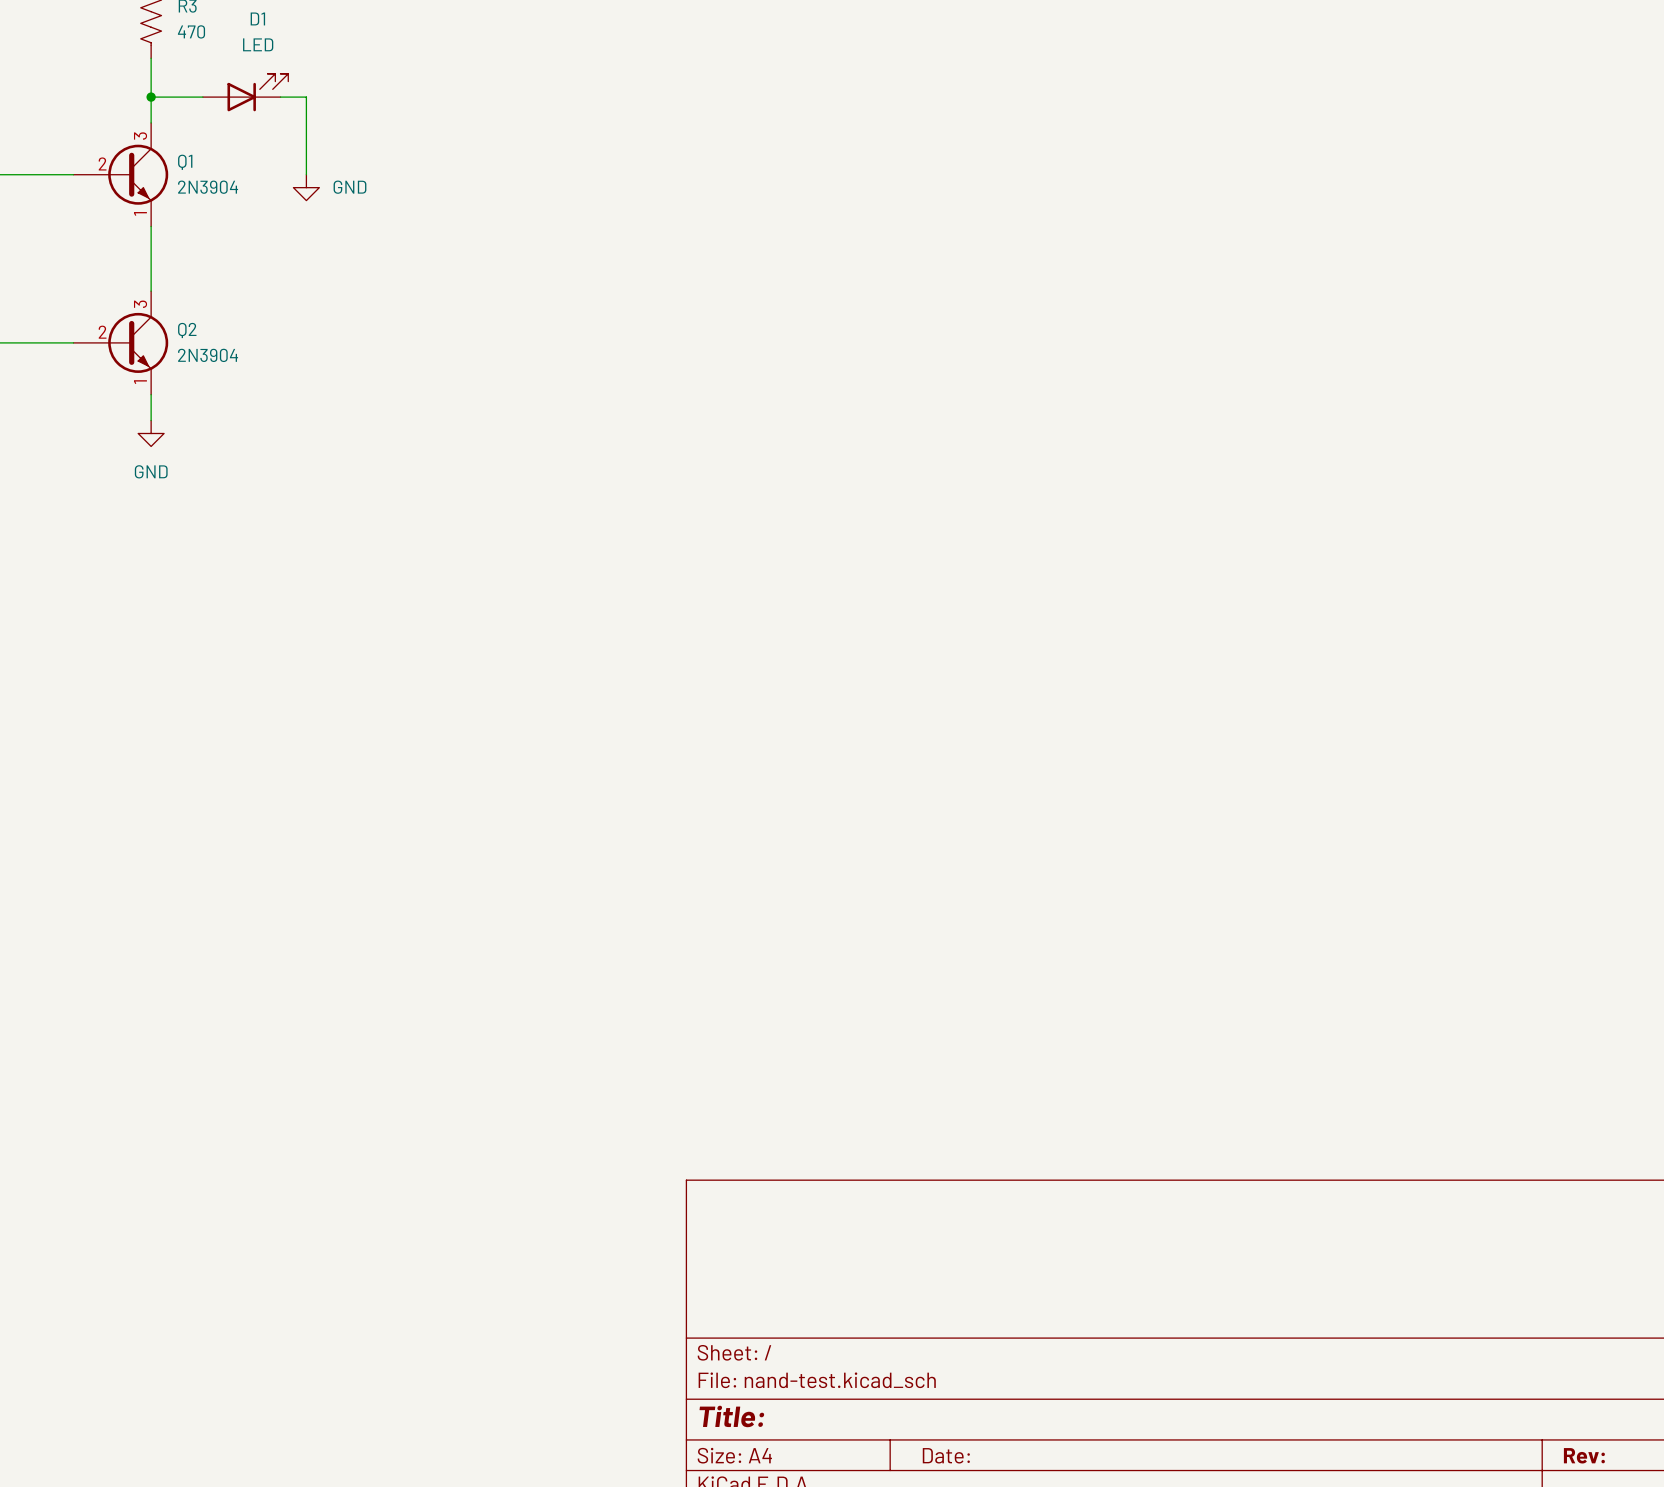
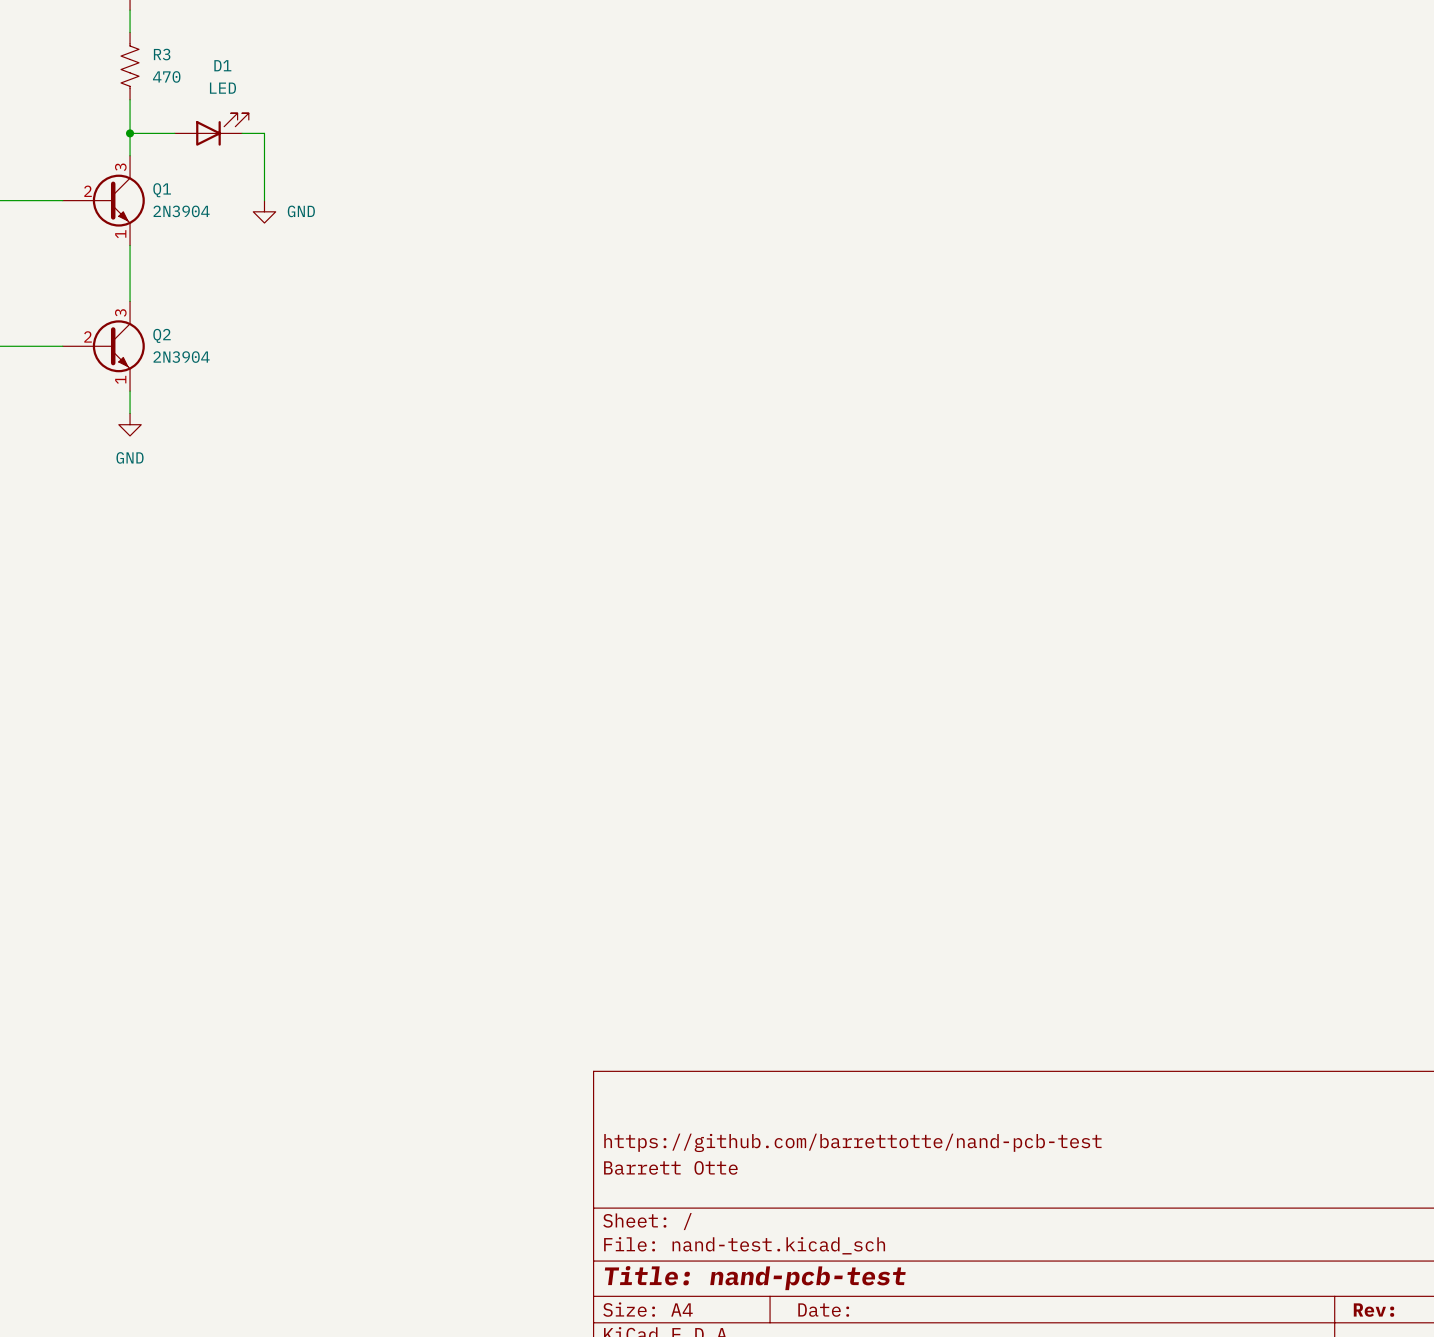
title block: none -> https://github.com/barrettotte/nand-pcb-test (852, 1142)
title block: none -> Barrett Otte (670, 1167)
title block: Title: (731, 1416) -> Title: nand-pcb-test (755, 1278)

